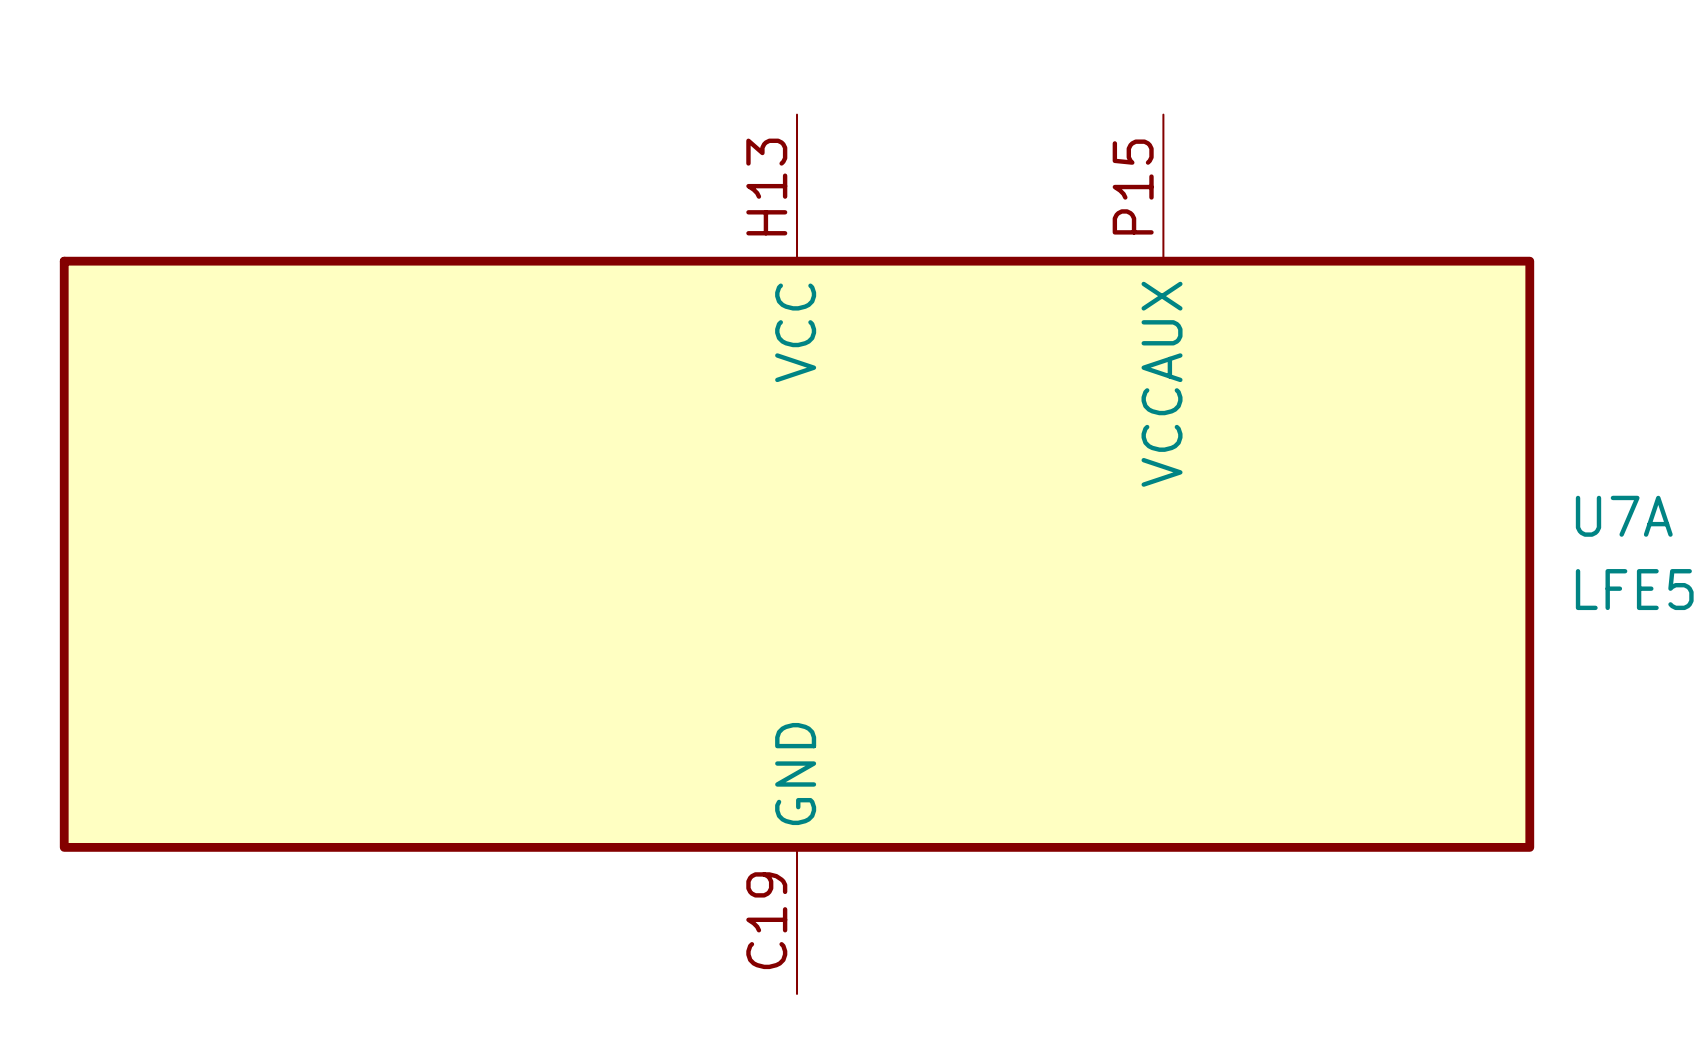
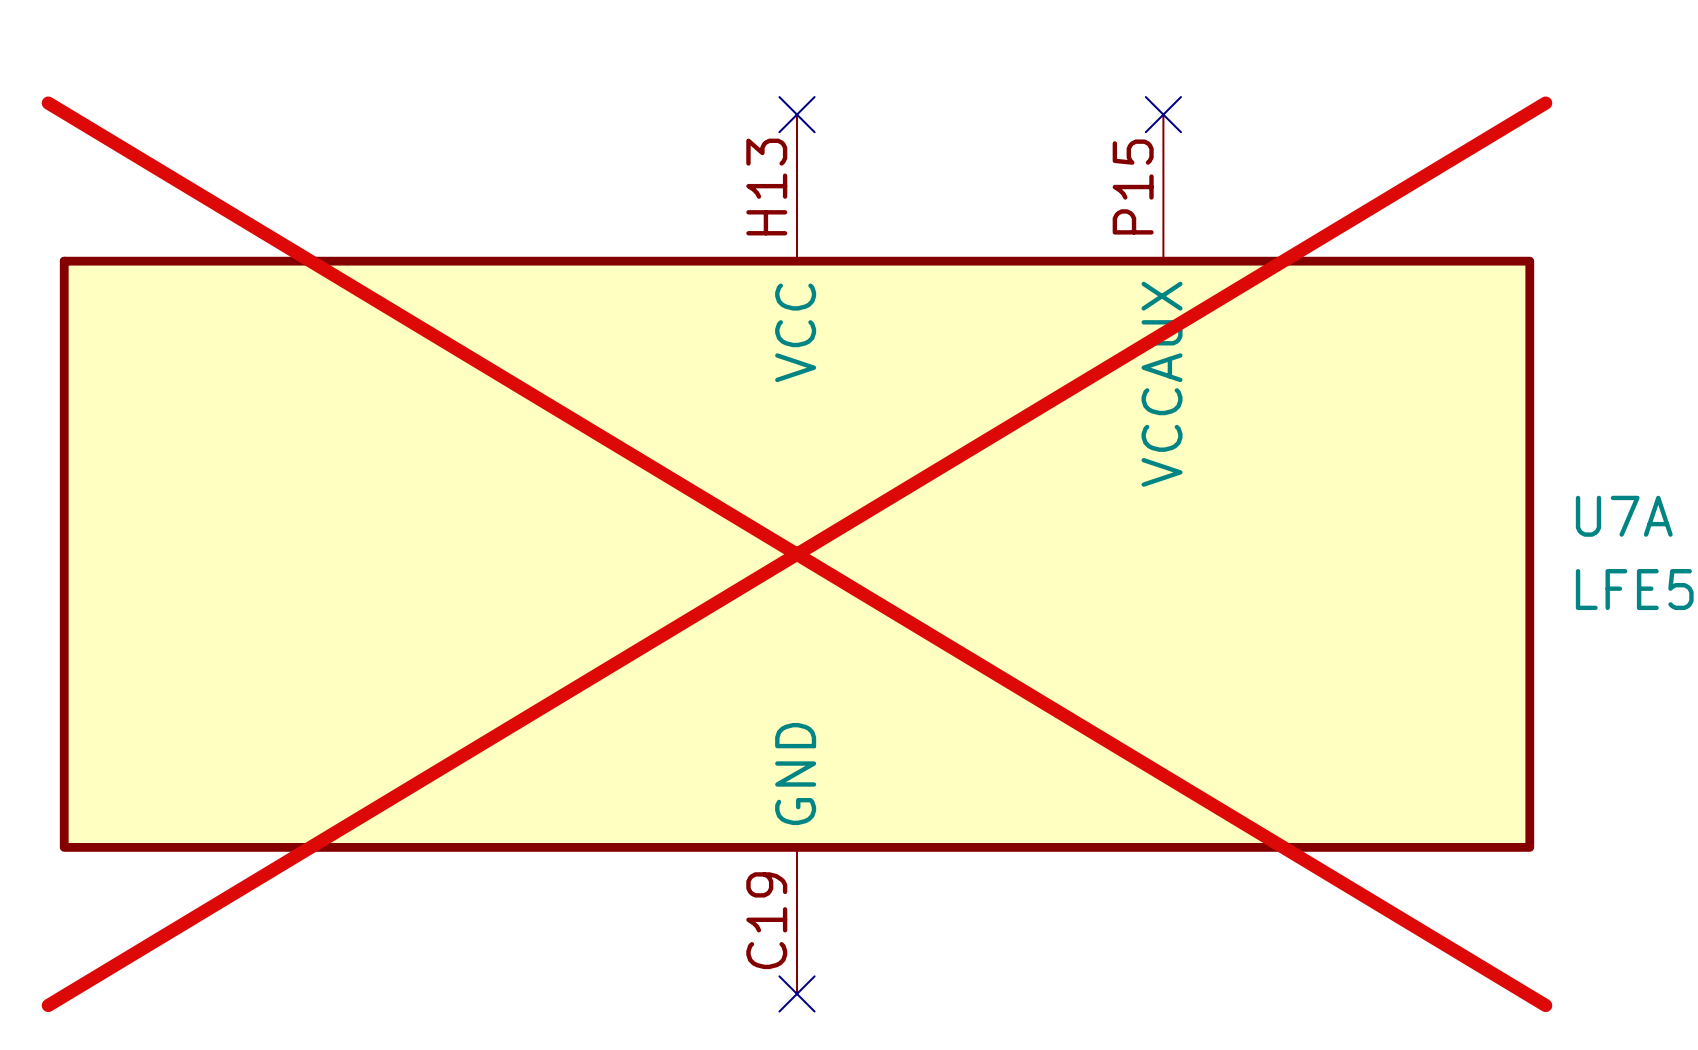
no-connect mark: none -> (797, 114)
no-connect mark: none -> (1163, 114)
U7A do-not-place cross: none -> (797, 554)
no-connect mark: none -> (797, 993)

